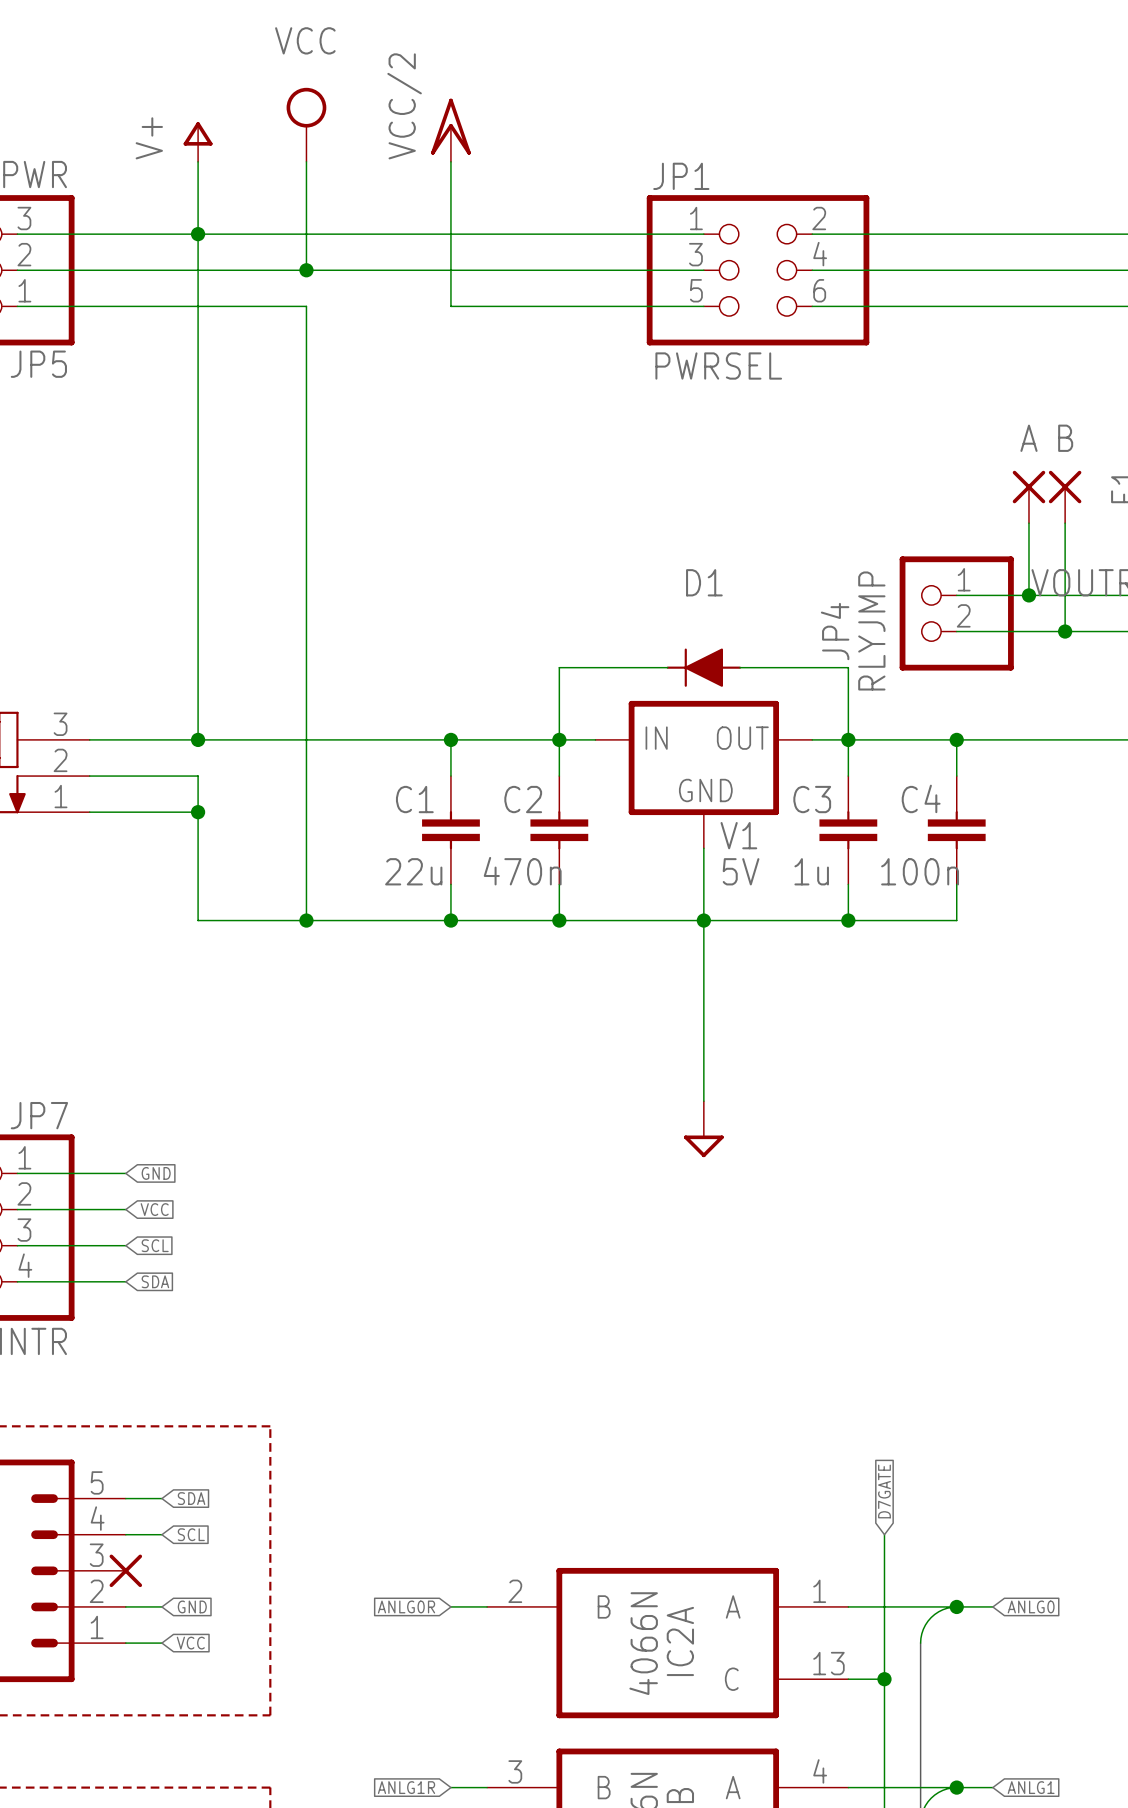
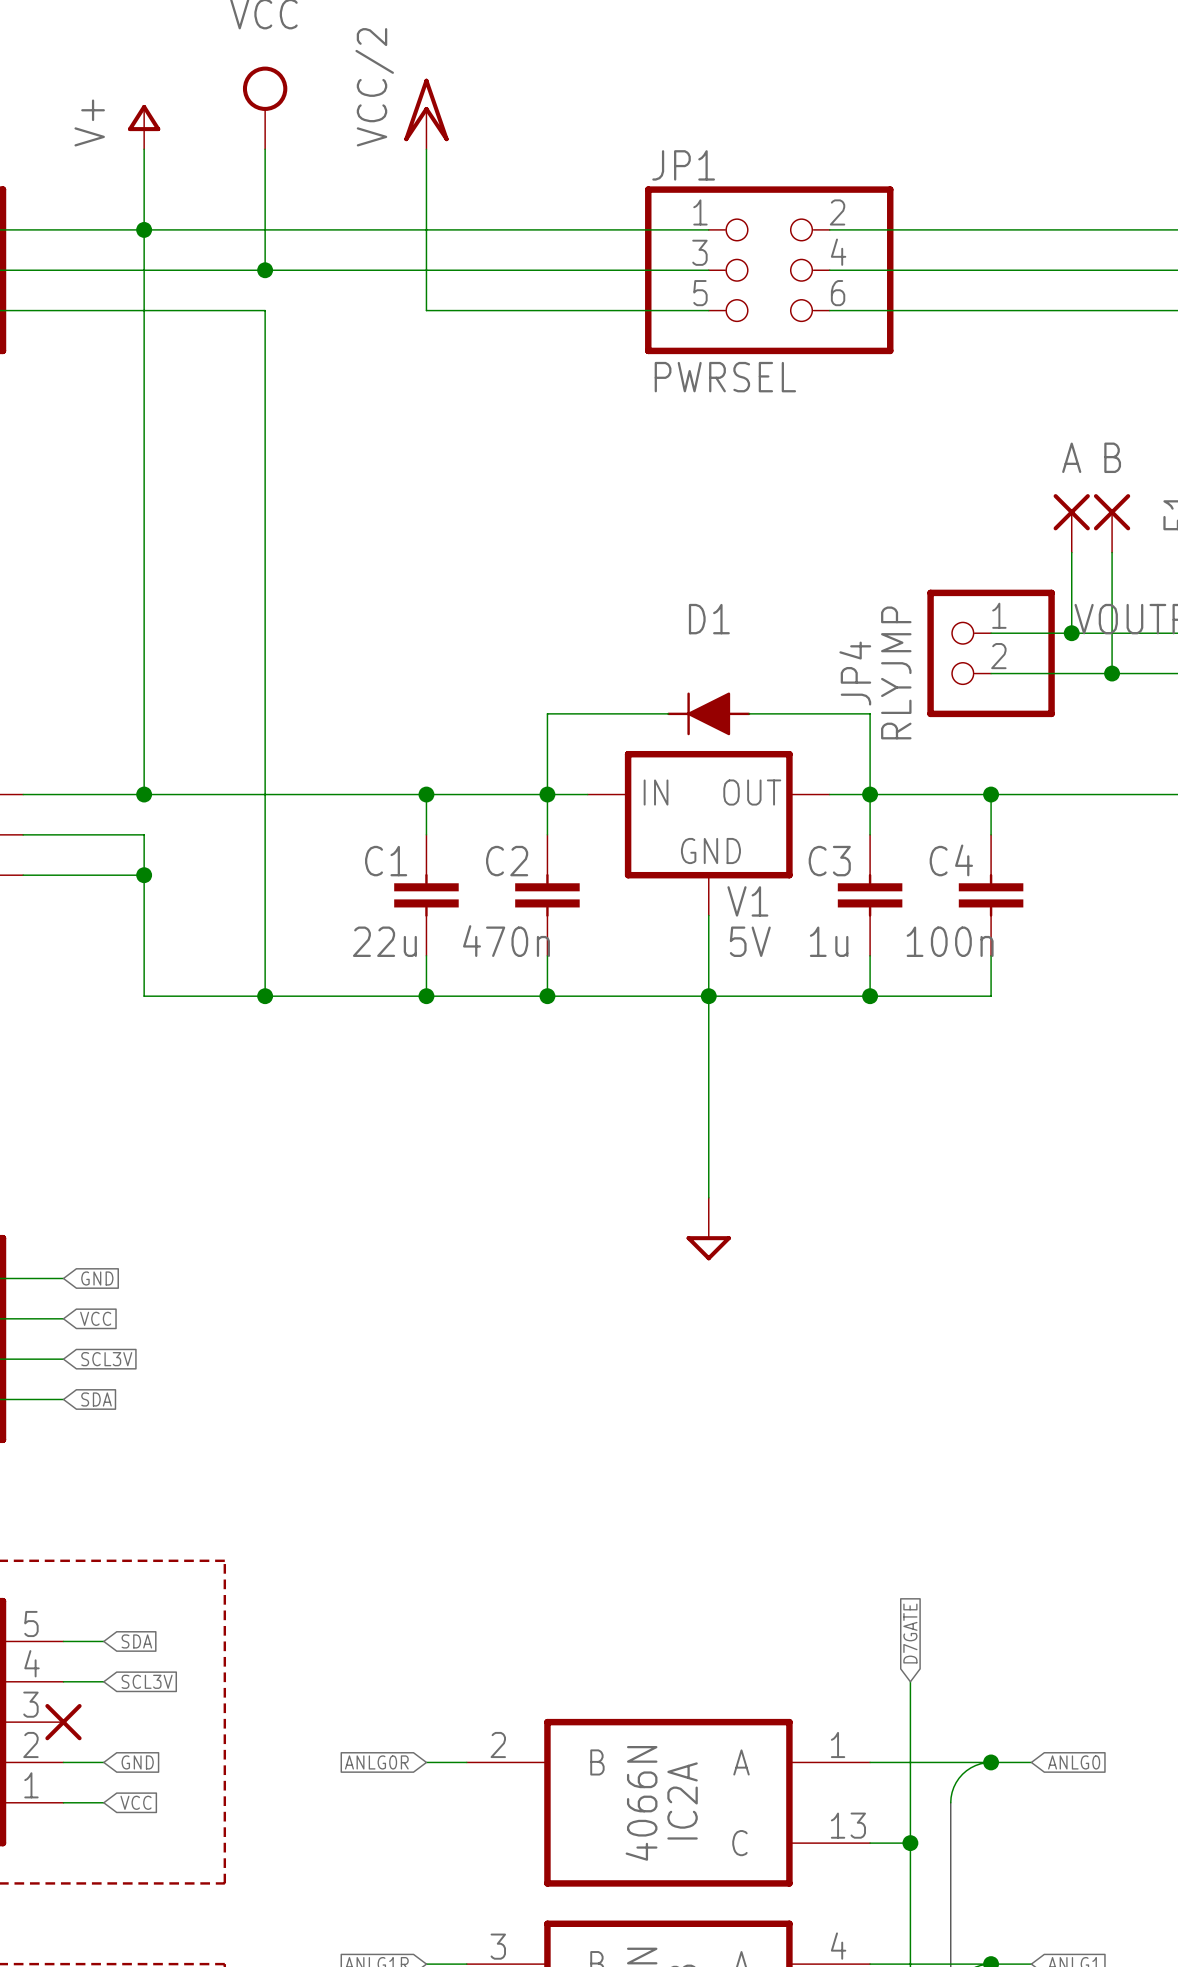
global label: SCL (155, 1245) -> SCL3V (106, 1359)
global label: SCL (191, 1534) -> SCL3V (147, 1681)

